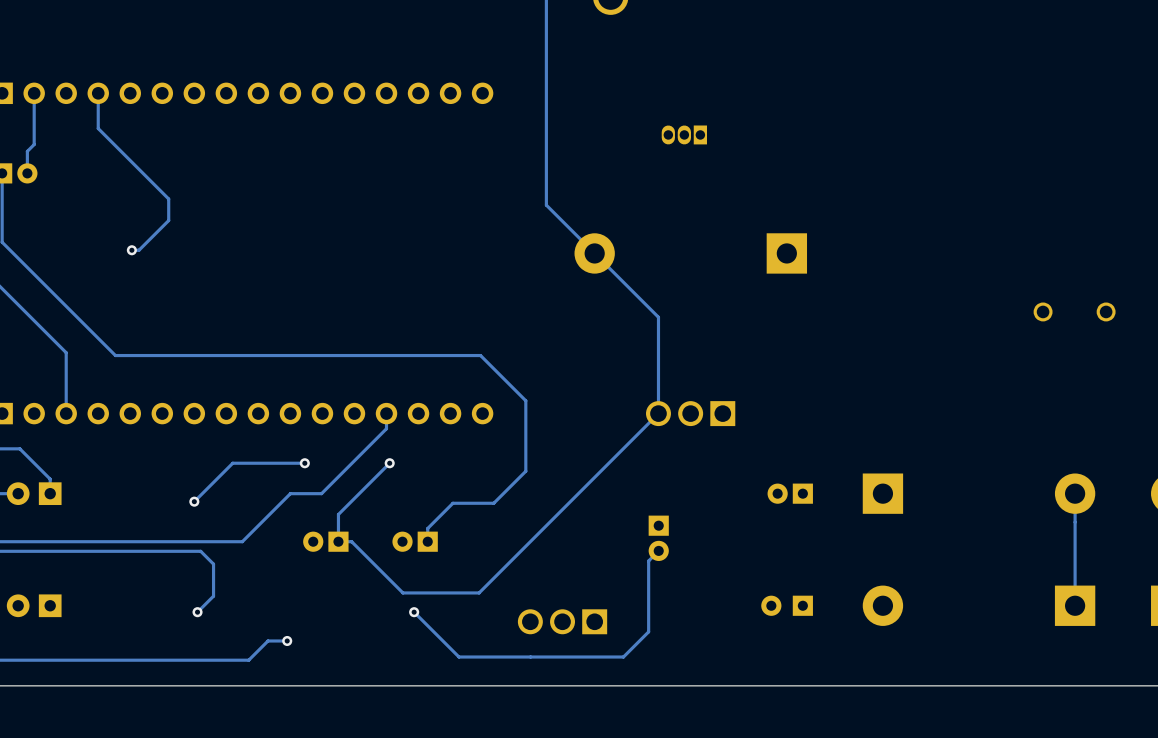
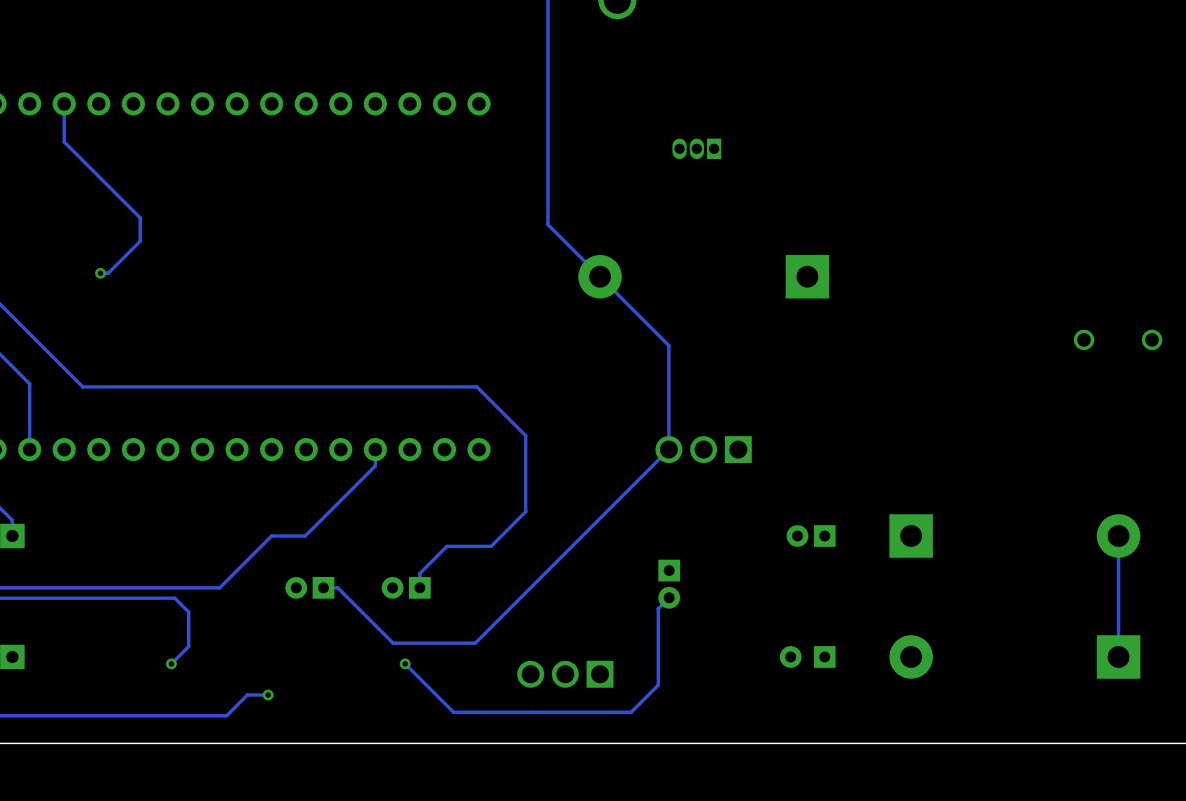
track: (304, 463) (232, 463) (194, 501) -> none
via: (304, 463) -> none
track: (389, 463) (338, 514) (338, 541) -> none
via: (389, 463) -> none
via: (194, 501) -> none

